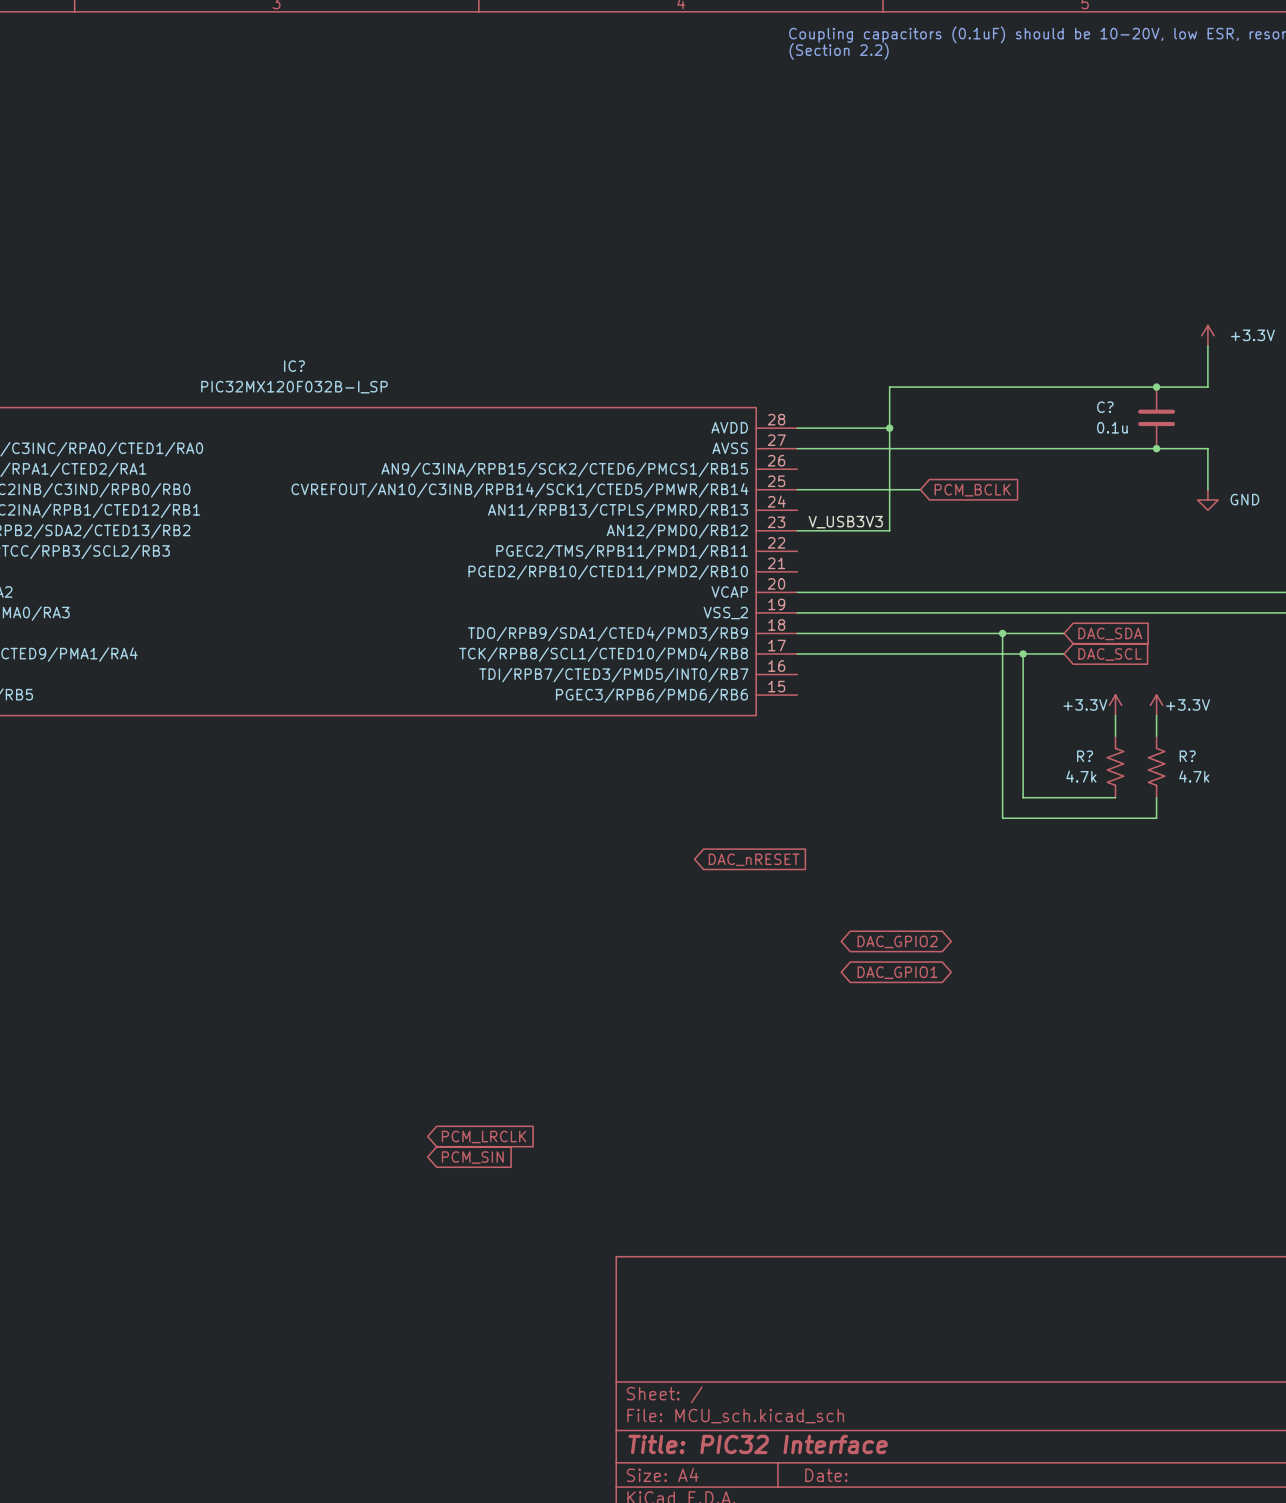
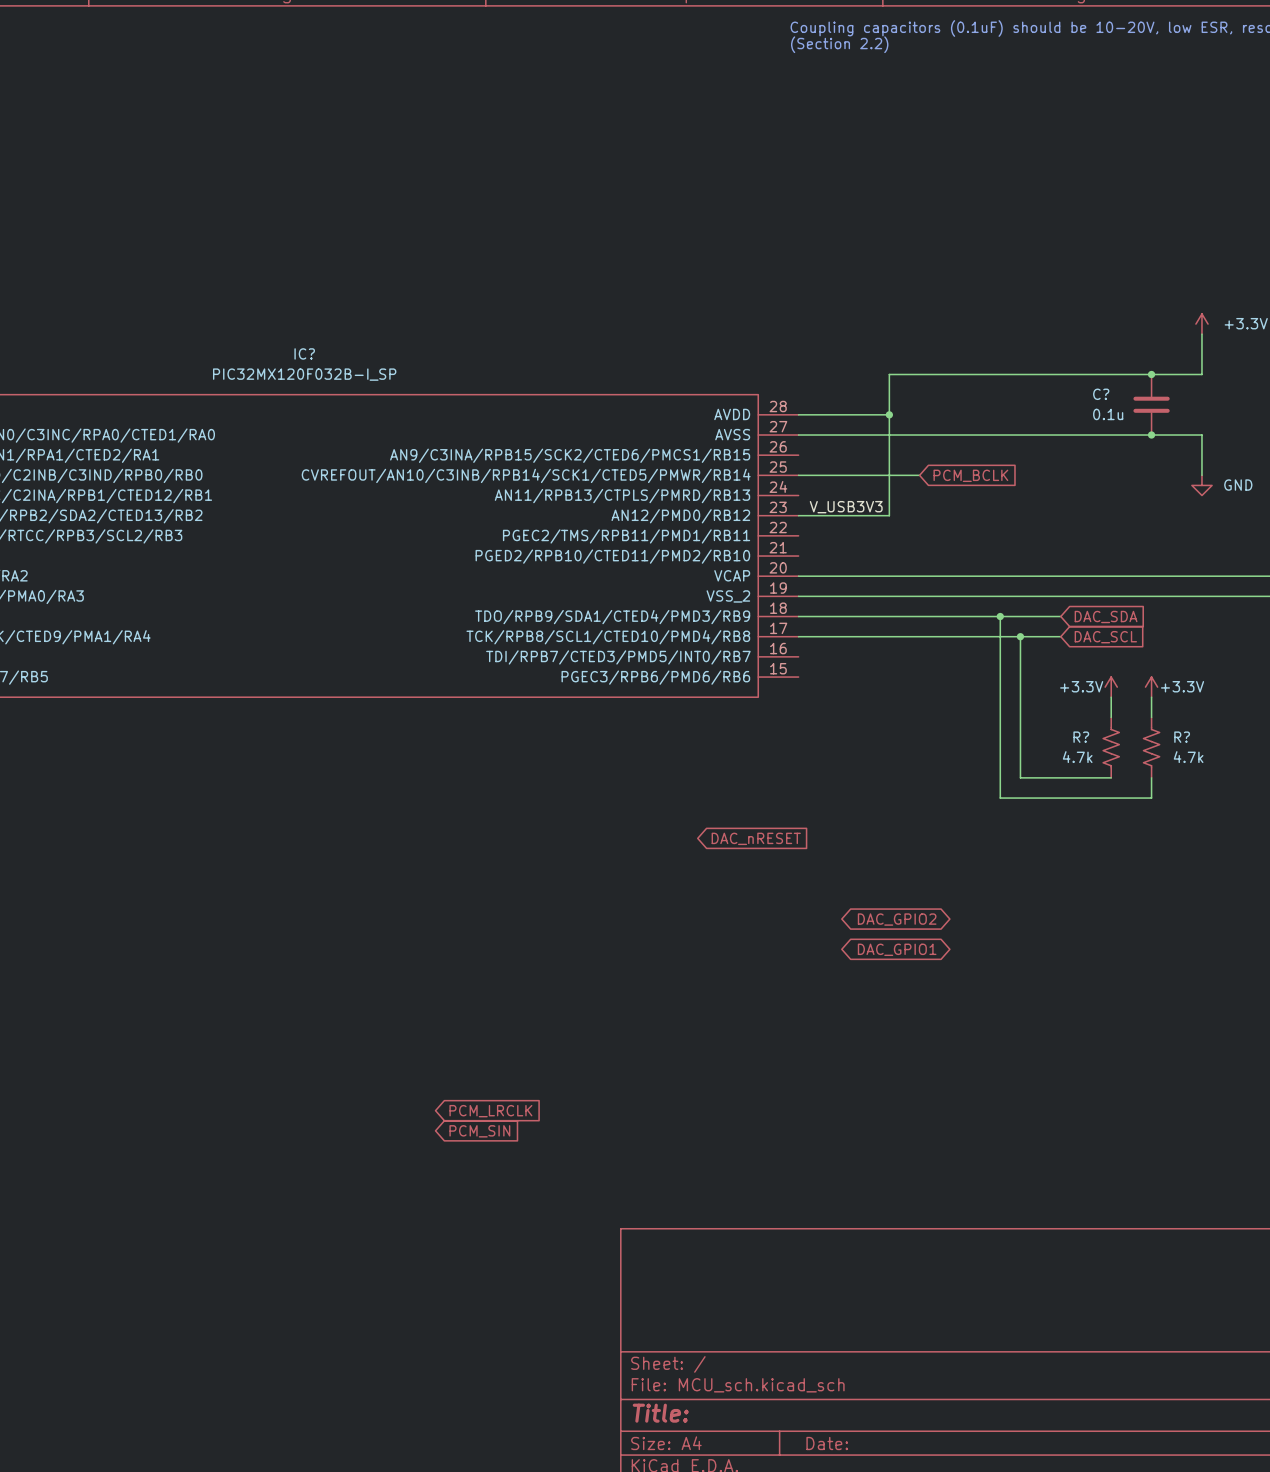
title block: Title: PIC32 Interface (758, 1444) -> Title: (660, 1413)

